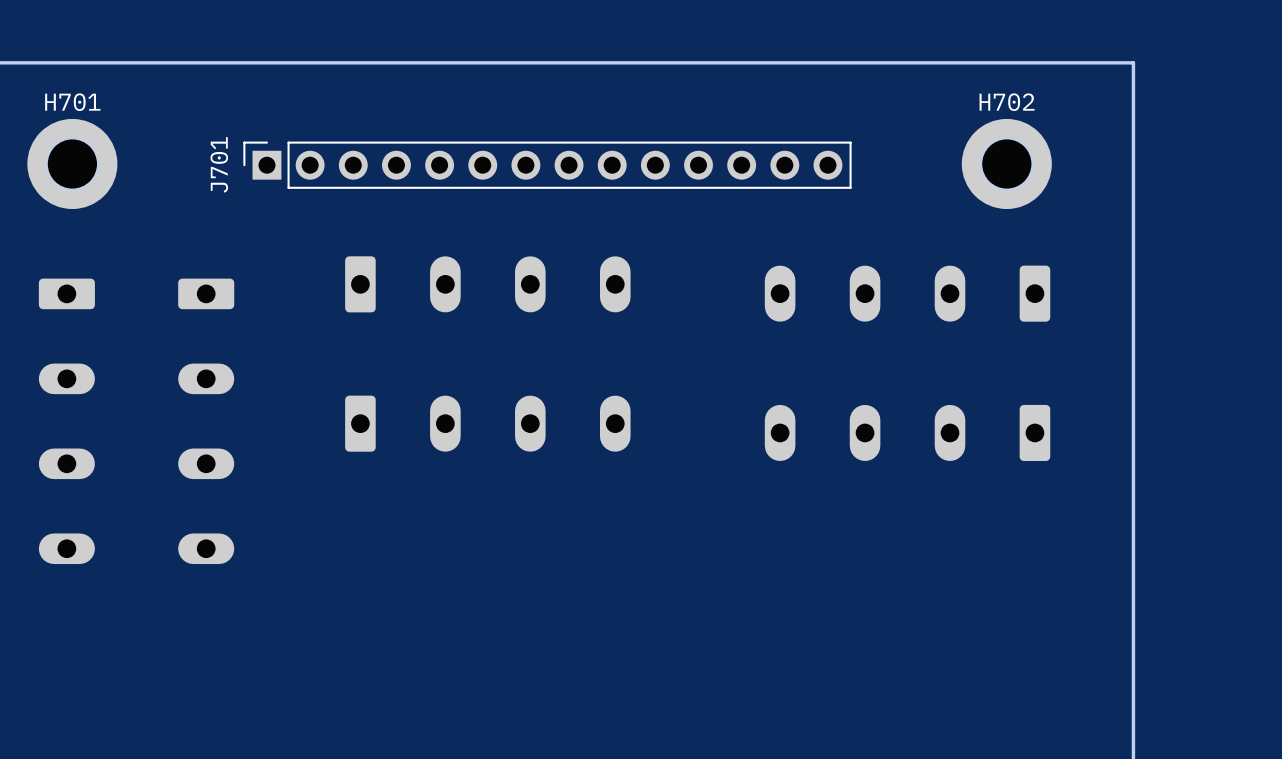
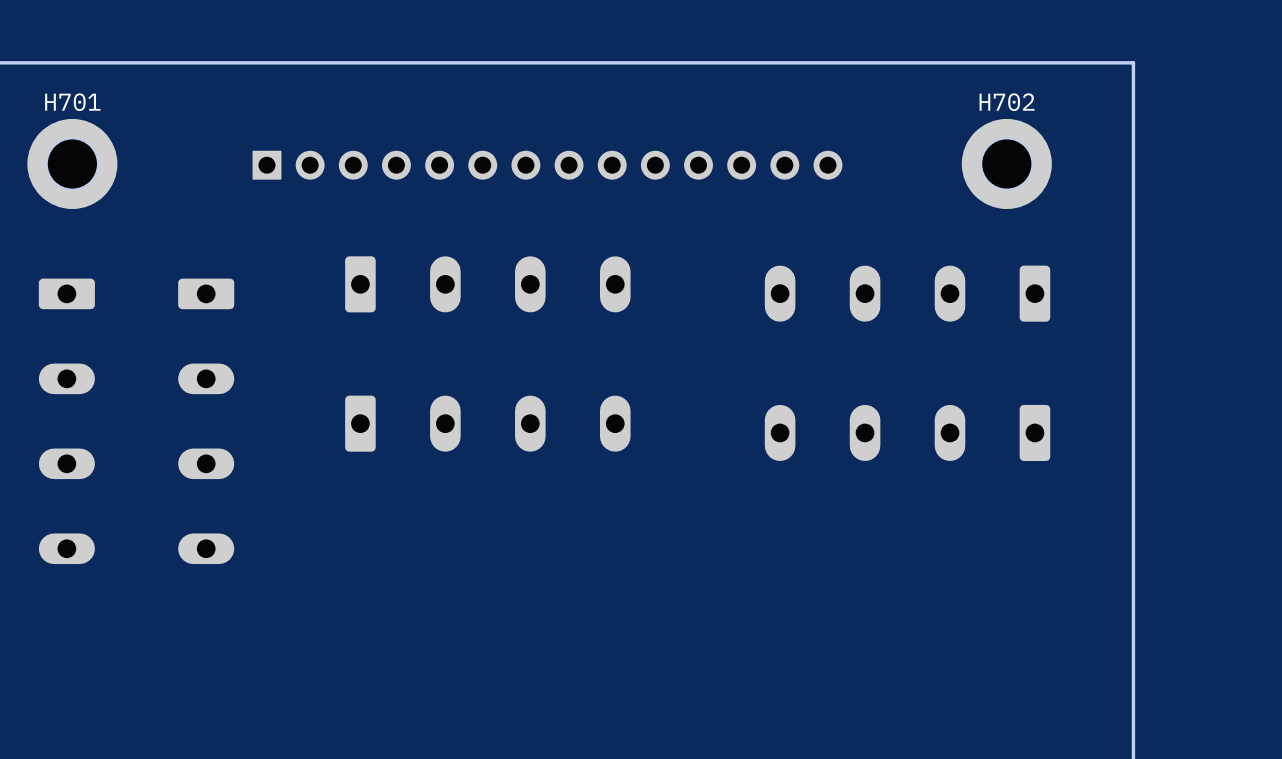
J701 side: top (547, 165) -> bottom (547, 165)

